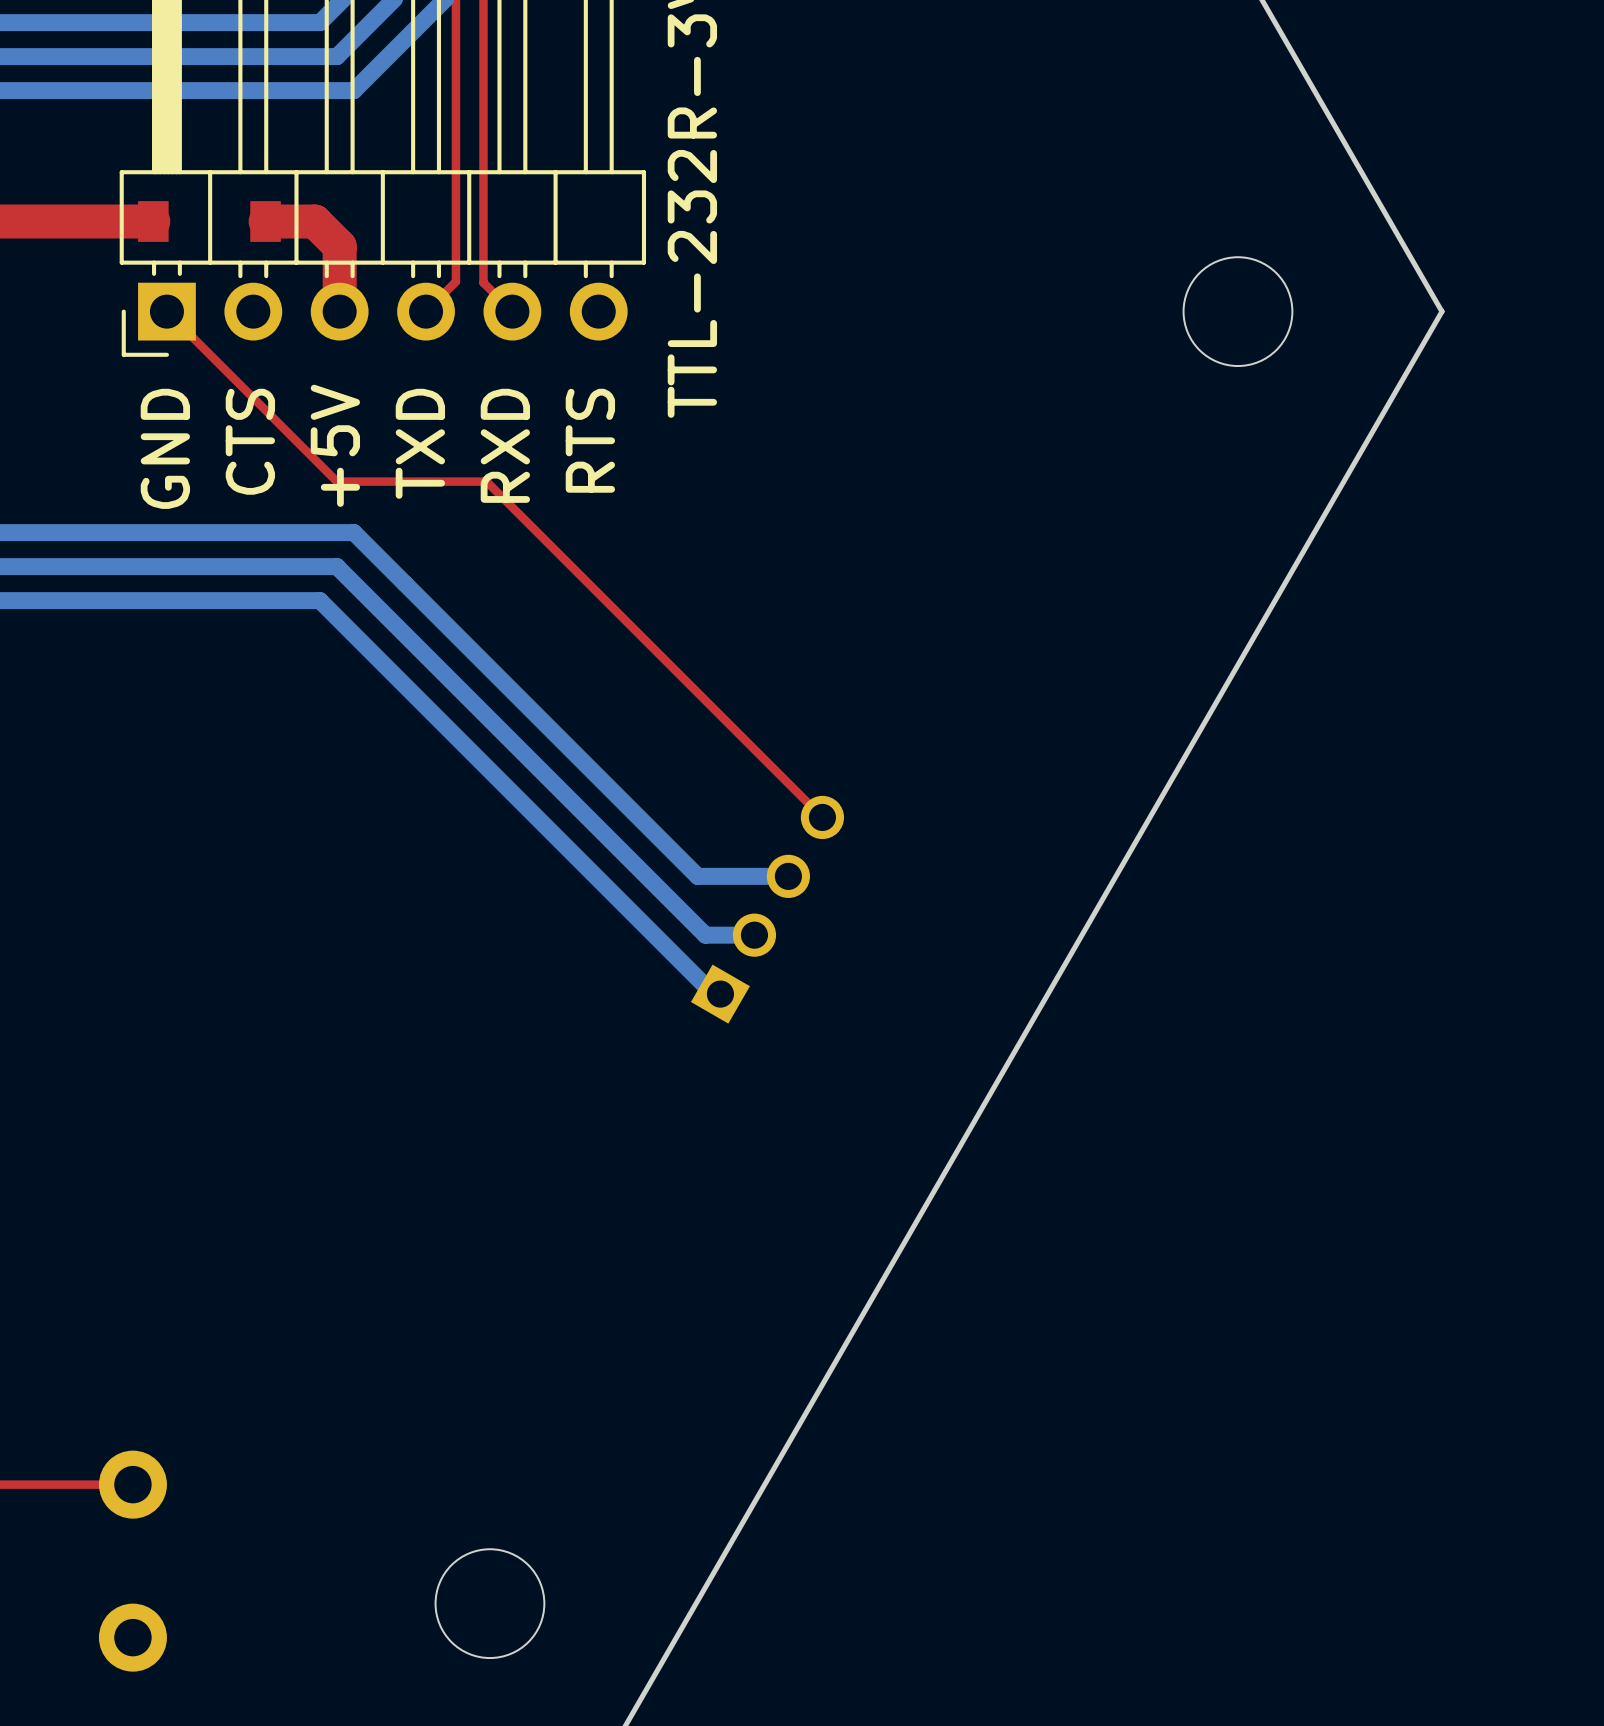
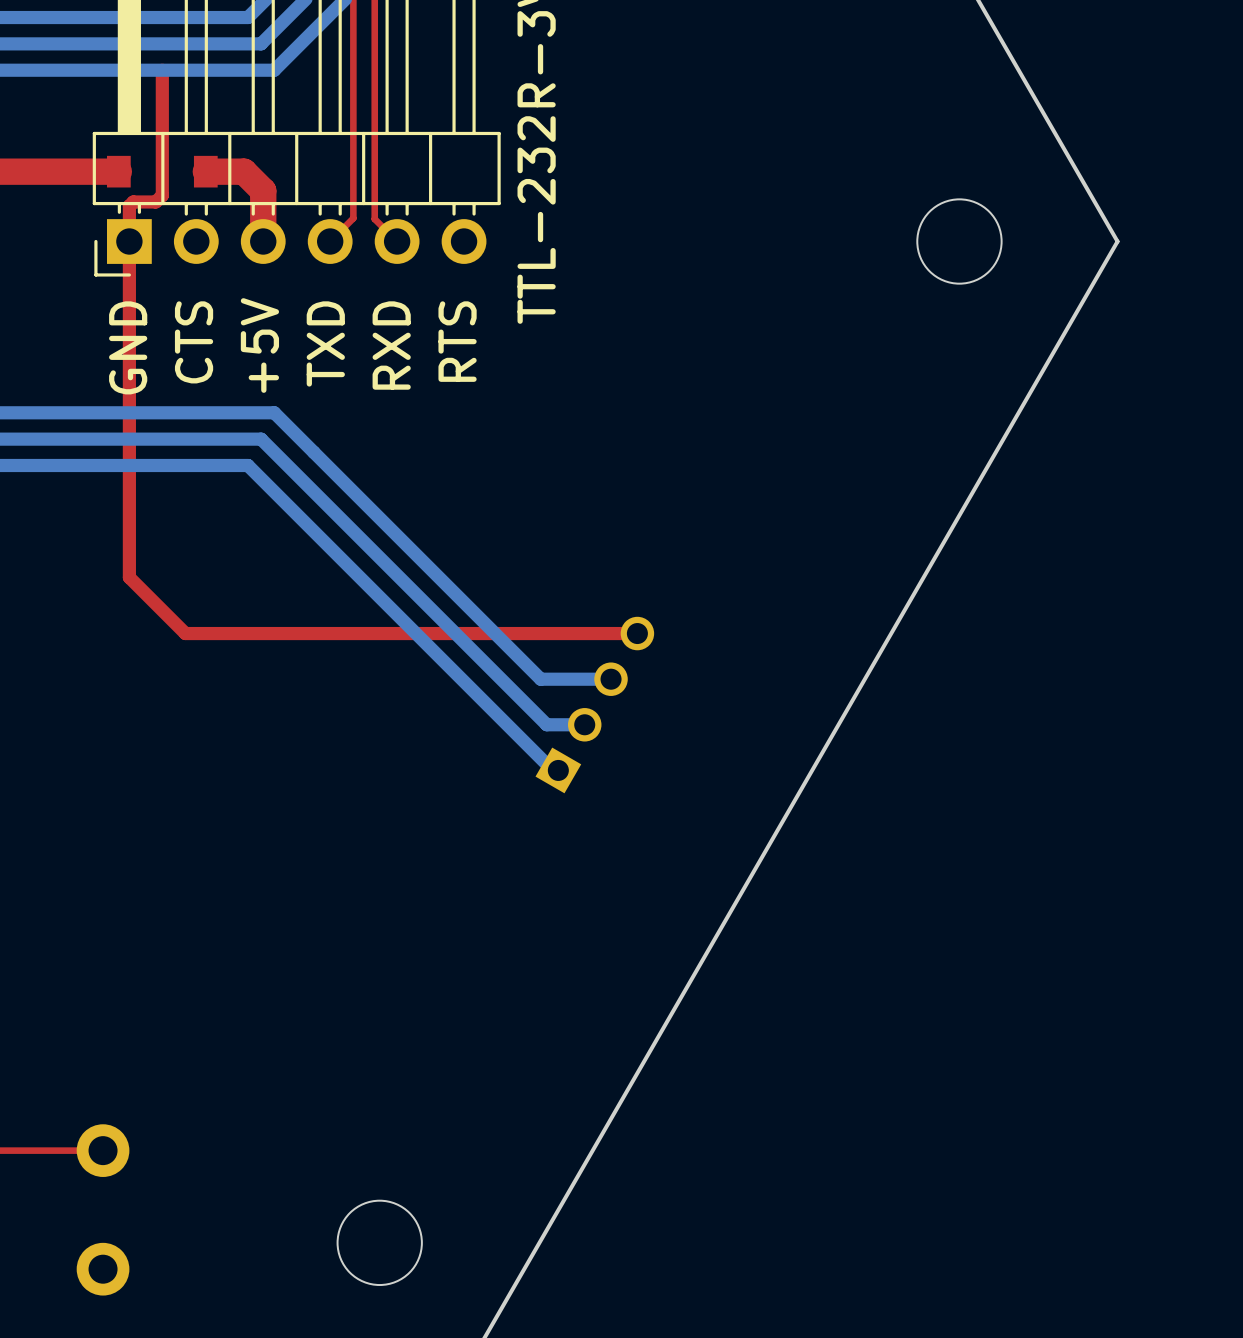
top track: (166, 311) (336, 481) (486, 481) (822, 817) -> (162, 70) (162, 195) (155, 201) (133, 201) (129, 205) (129, 577) (185, 633) (637, 633)

